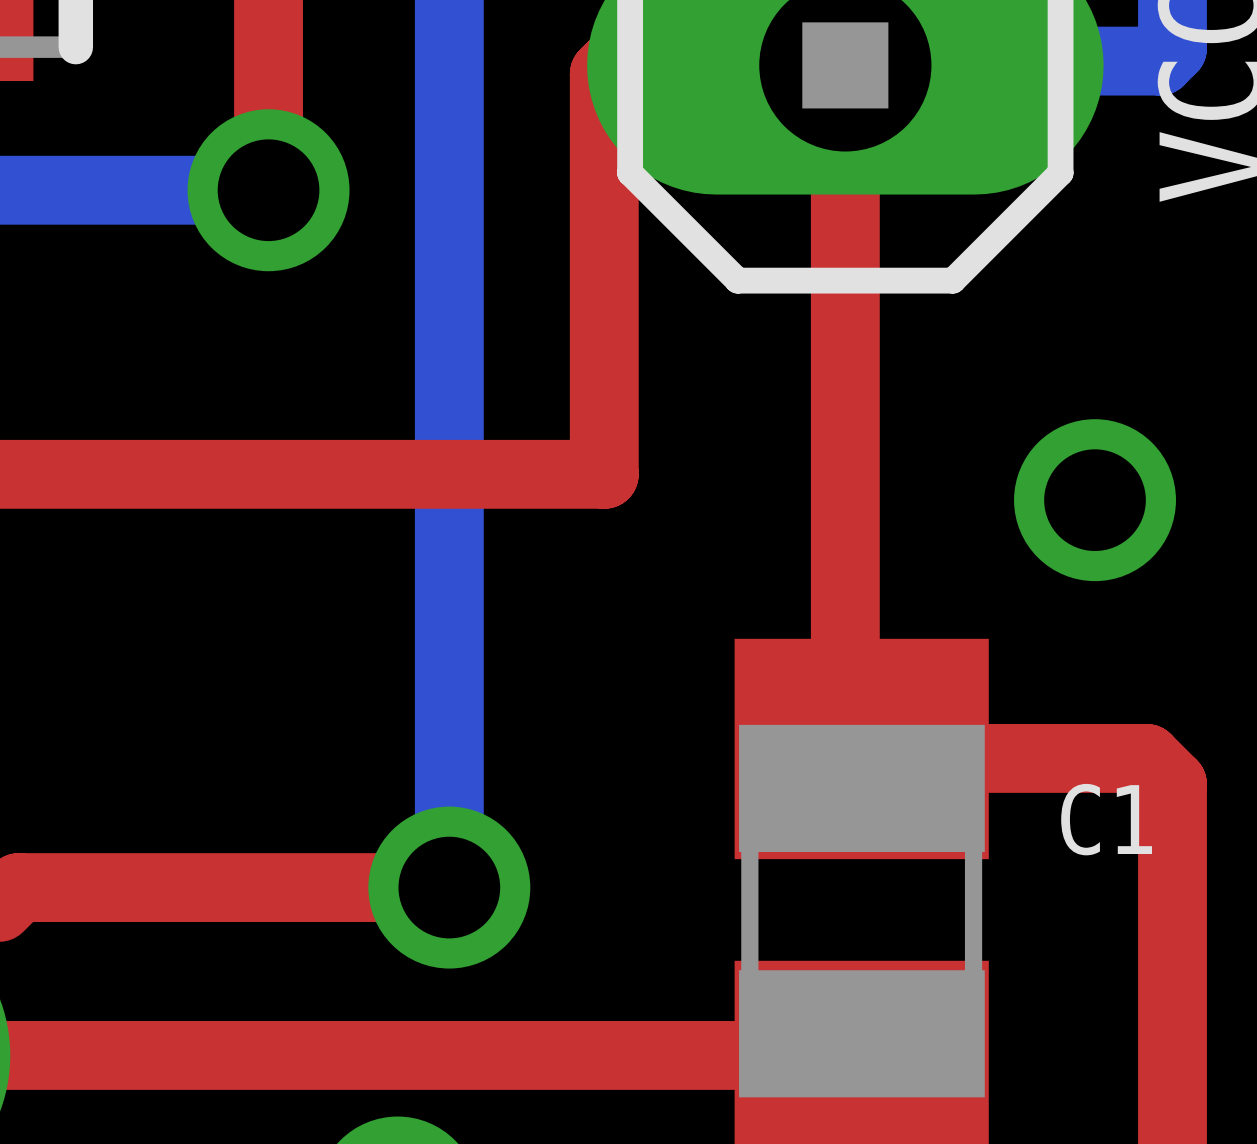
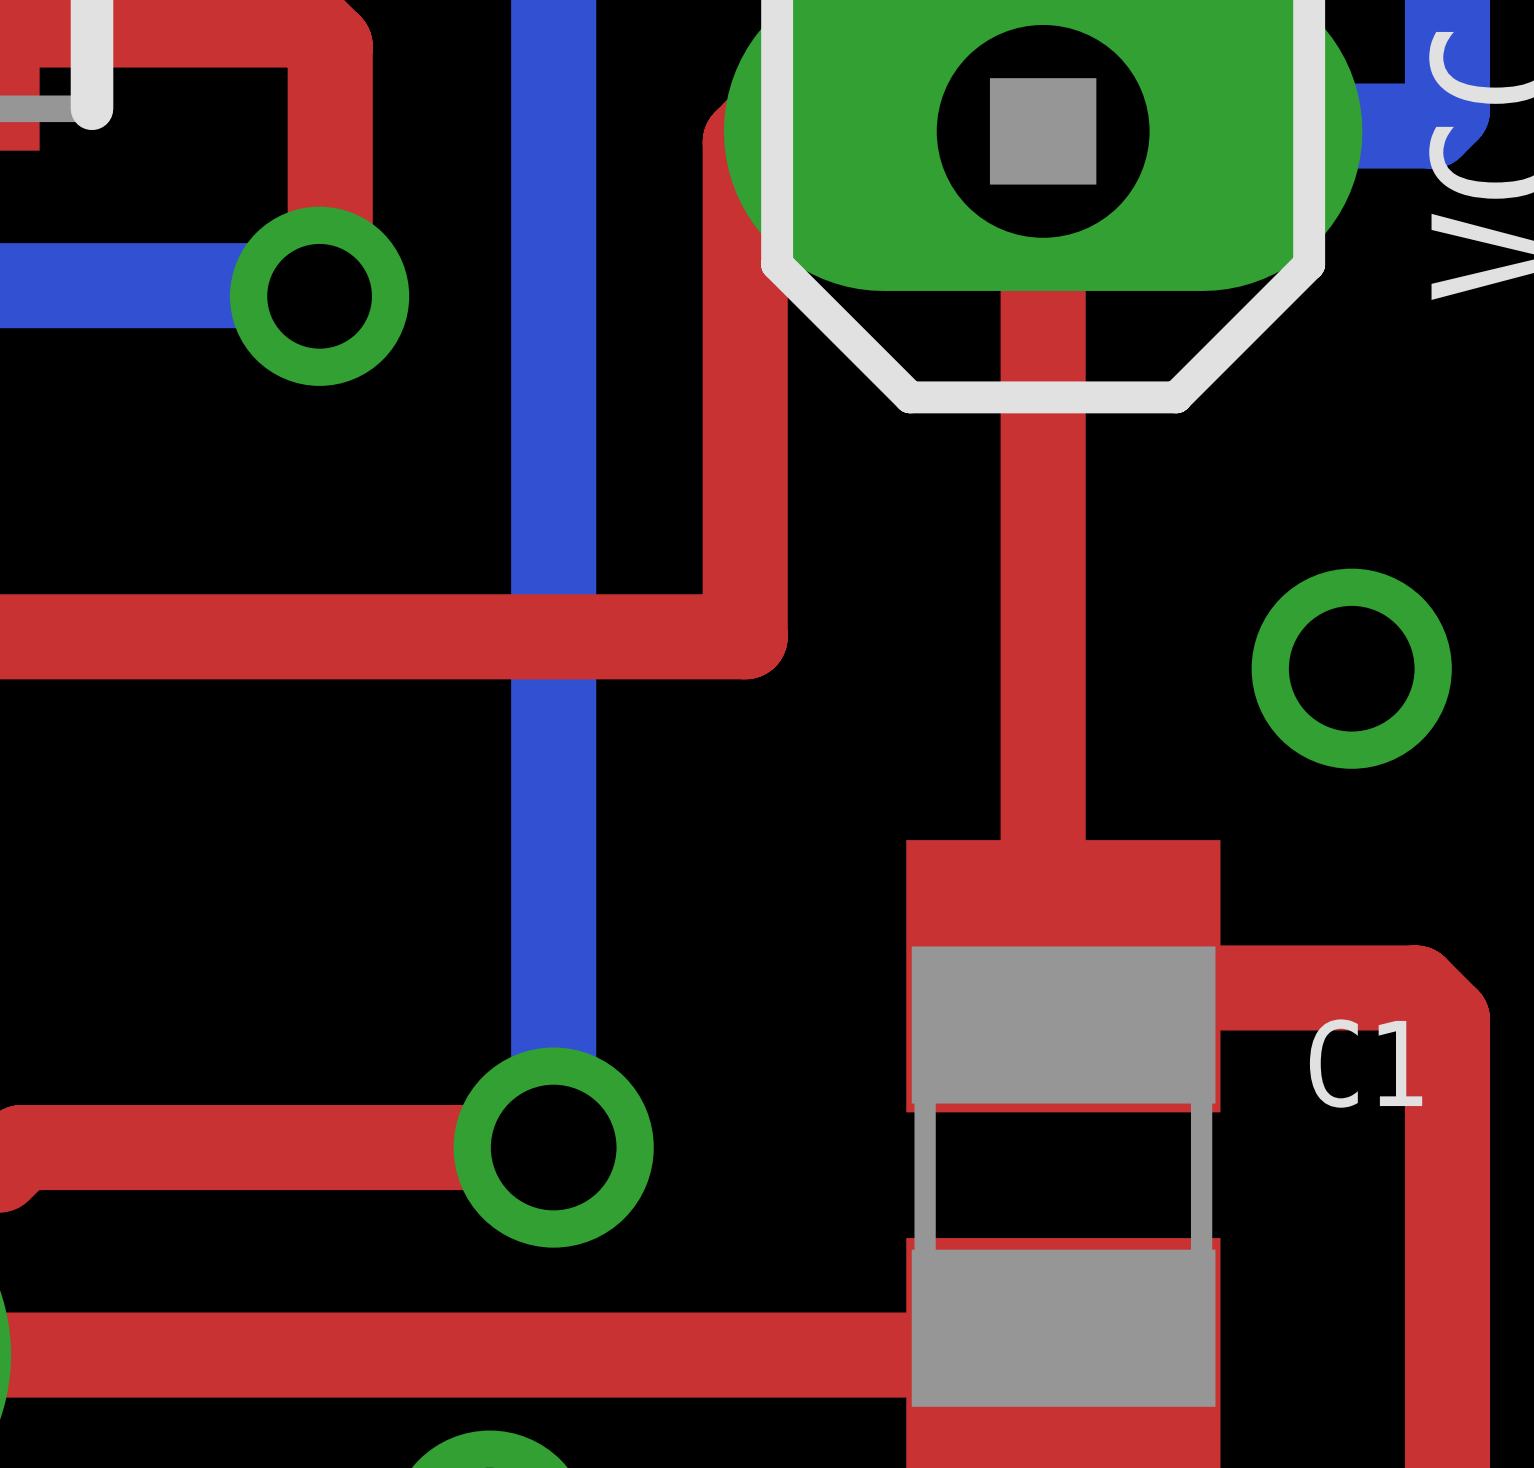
via size: [187, 109, 350, 272] -> [229, 206, 410, 386]

